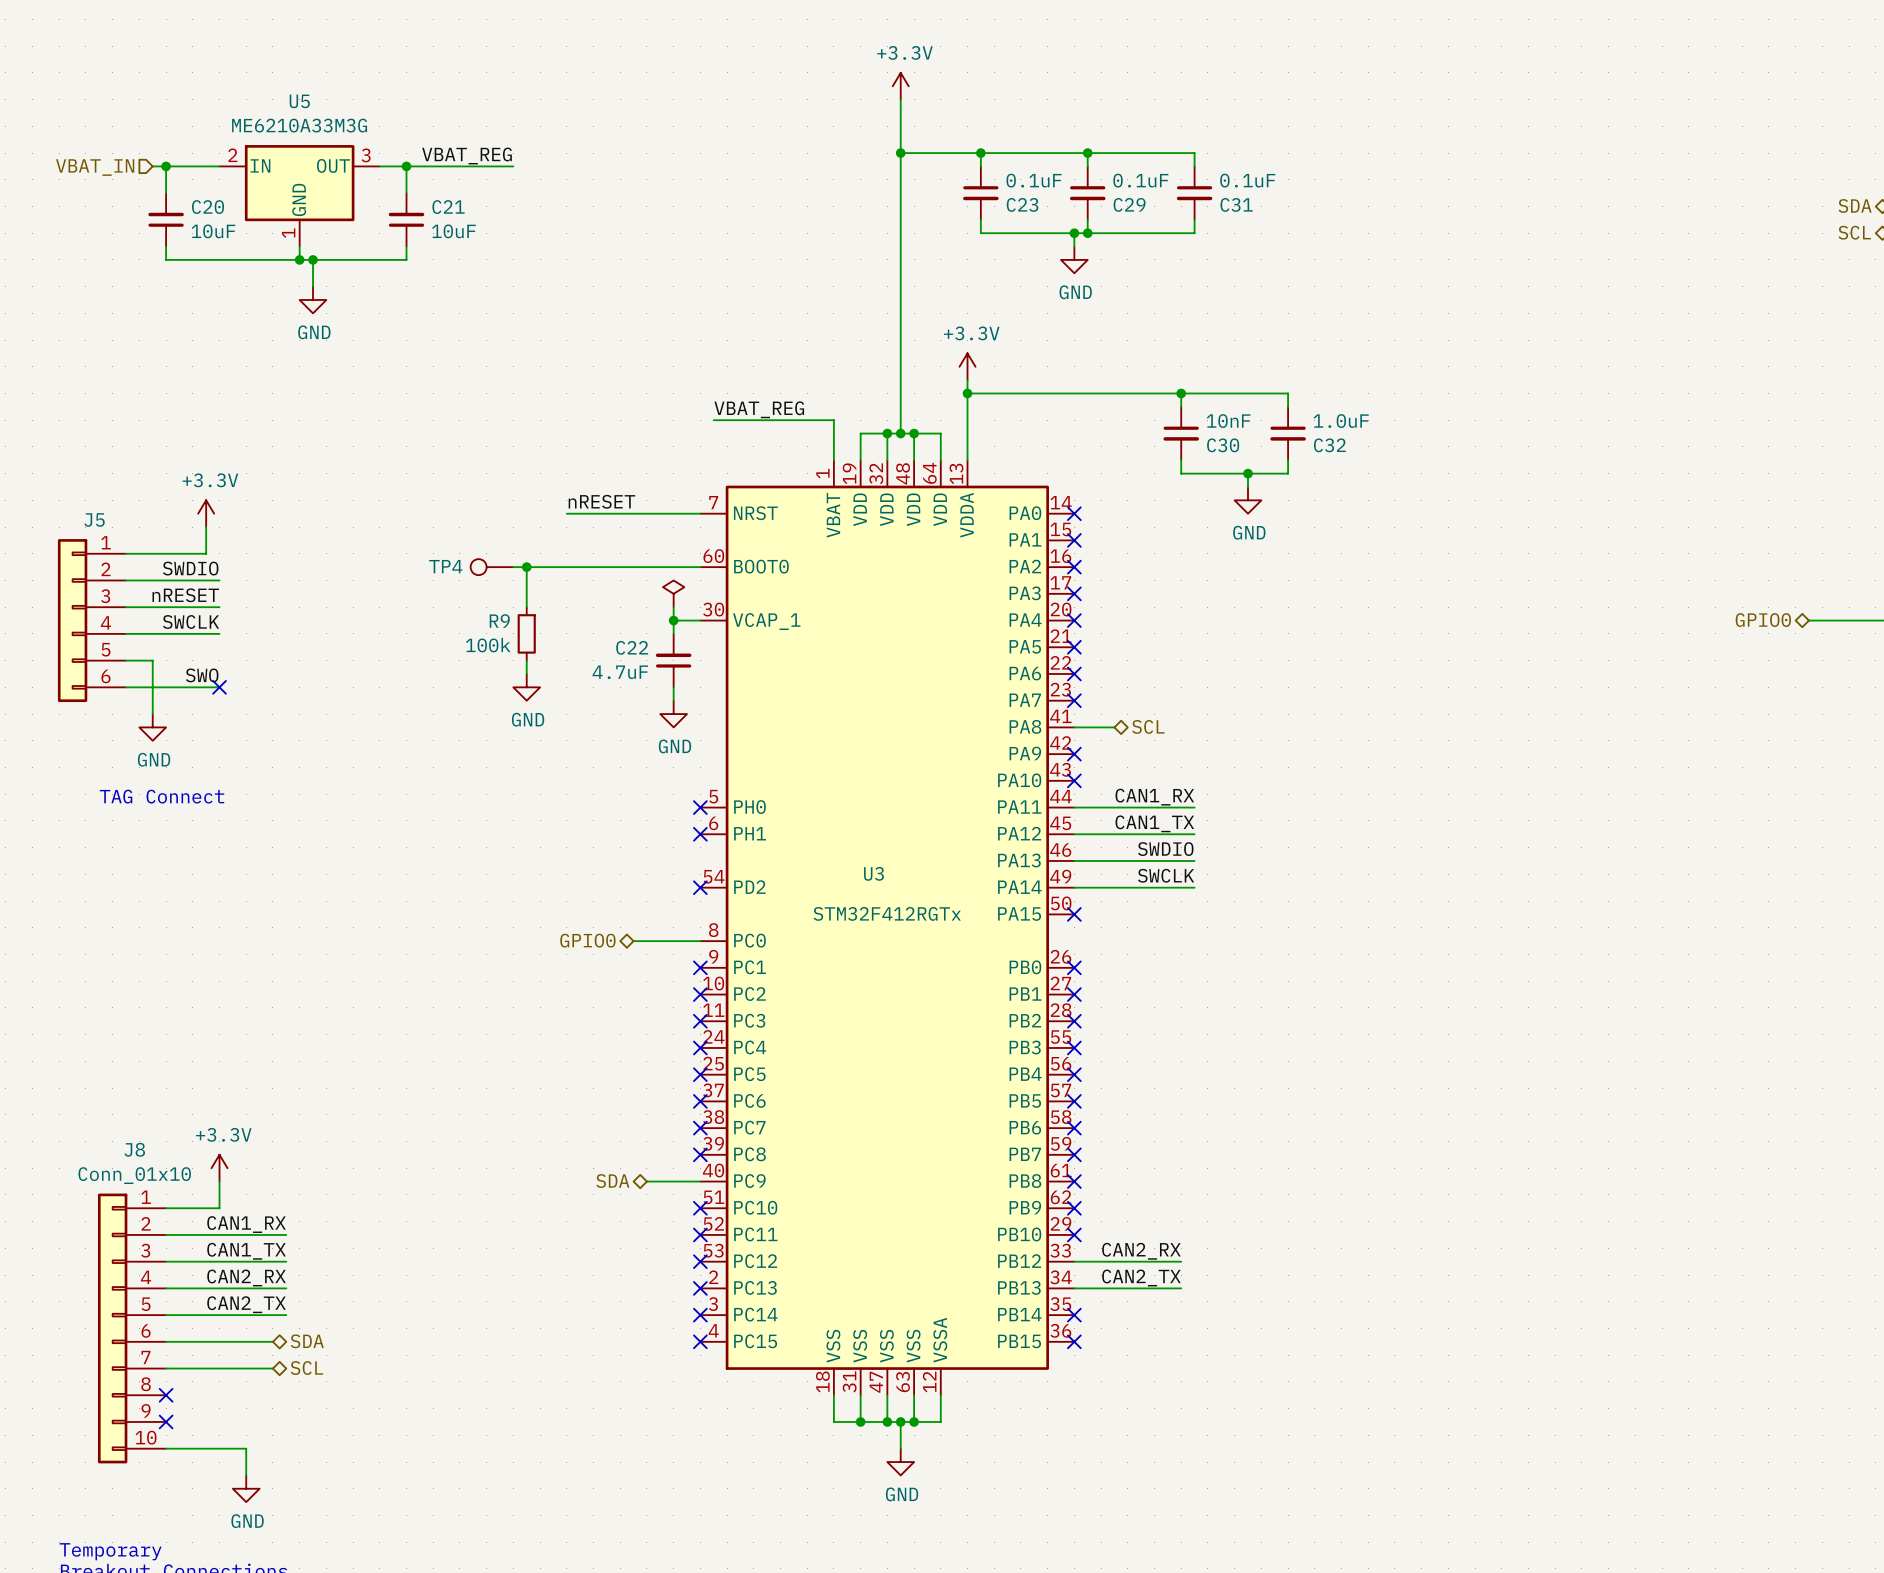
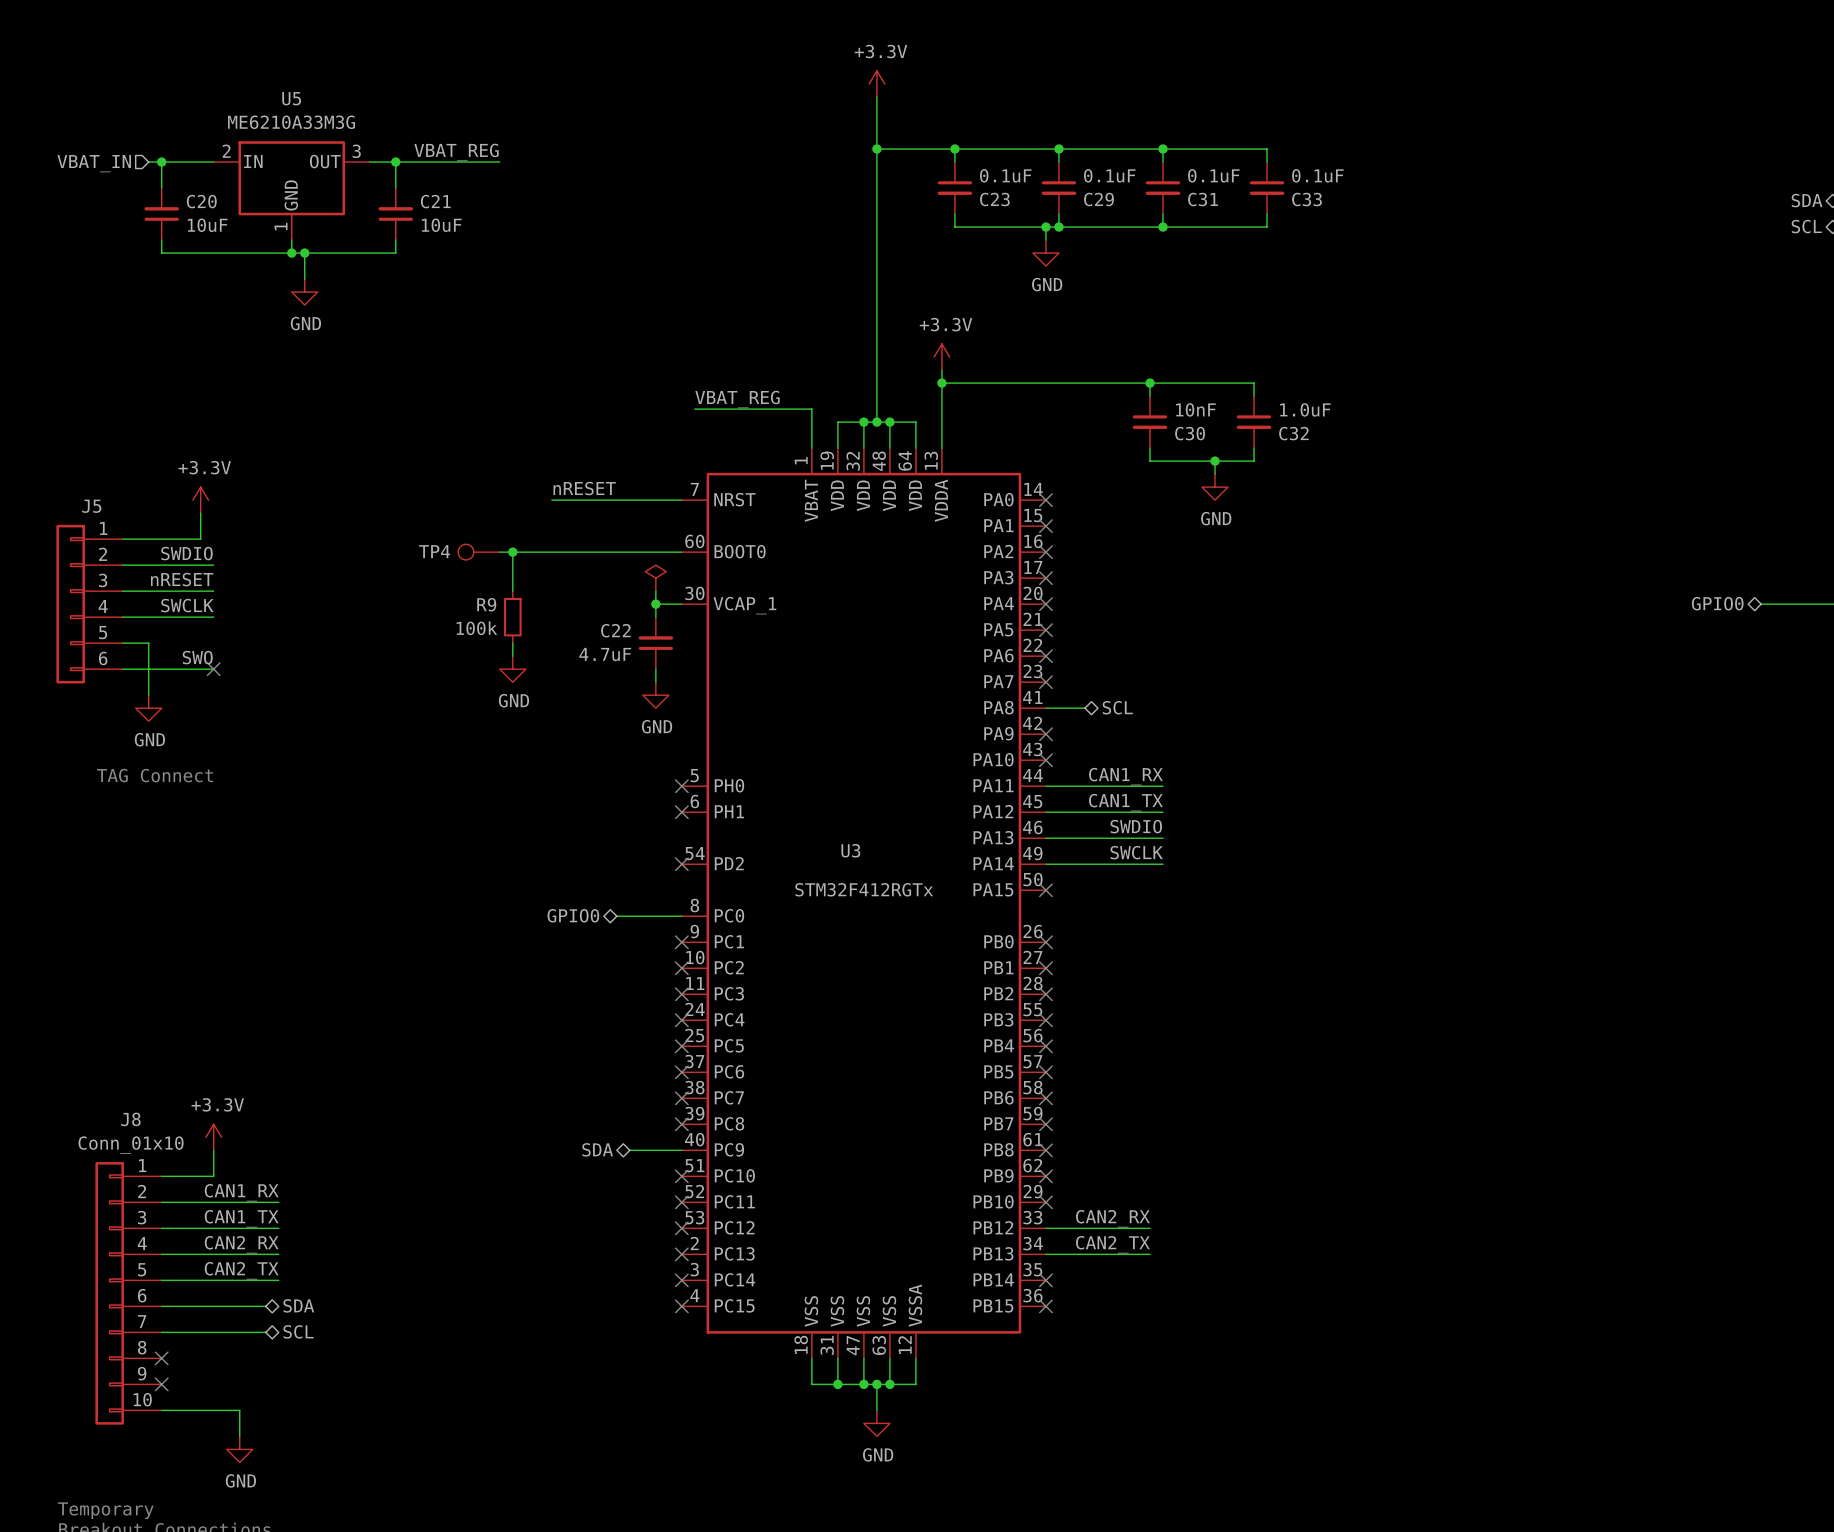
wire: none -> (1163, 149) (1267, 149) (1267, 162)
junction: none -> (1163, 149)
C33: none -> 0.1uF (1267, 188)
wire: none -> (1267, 214) (1267, 227) (1163, 227)
junction: none -> (1163, 227)

